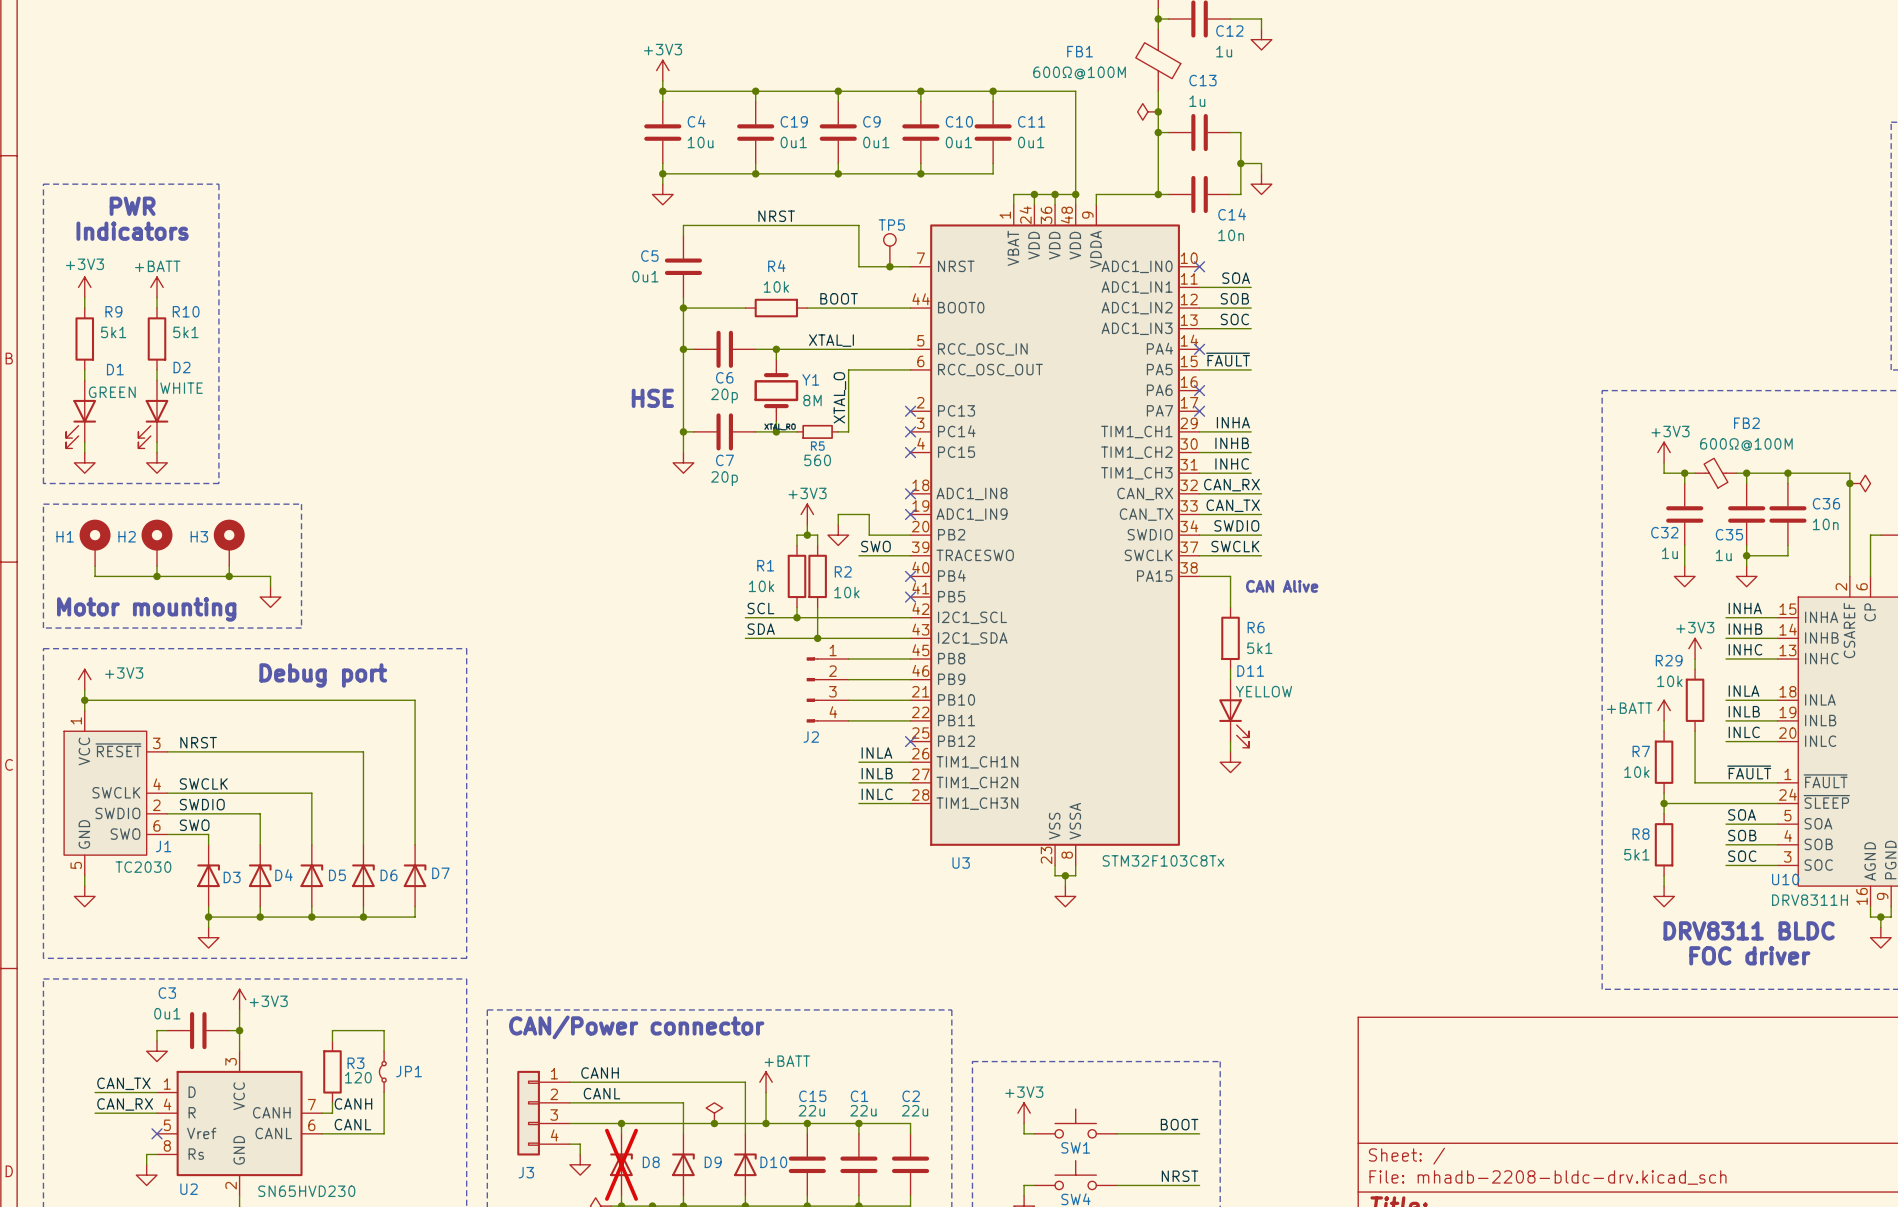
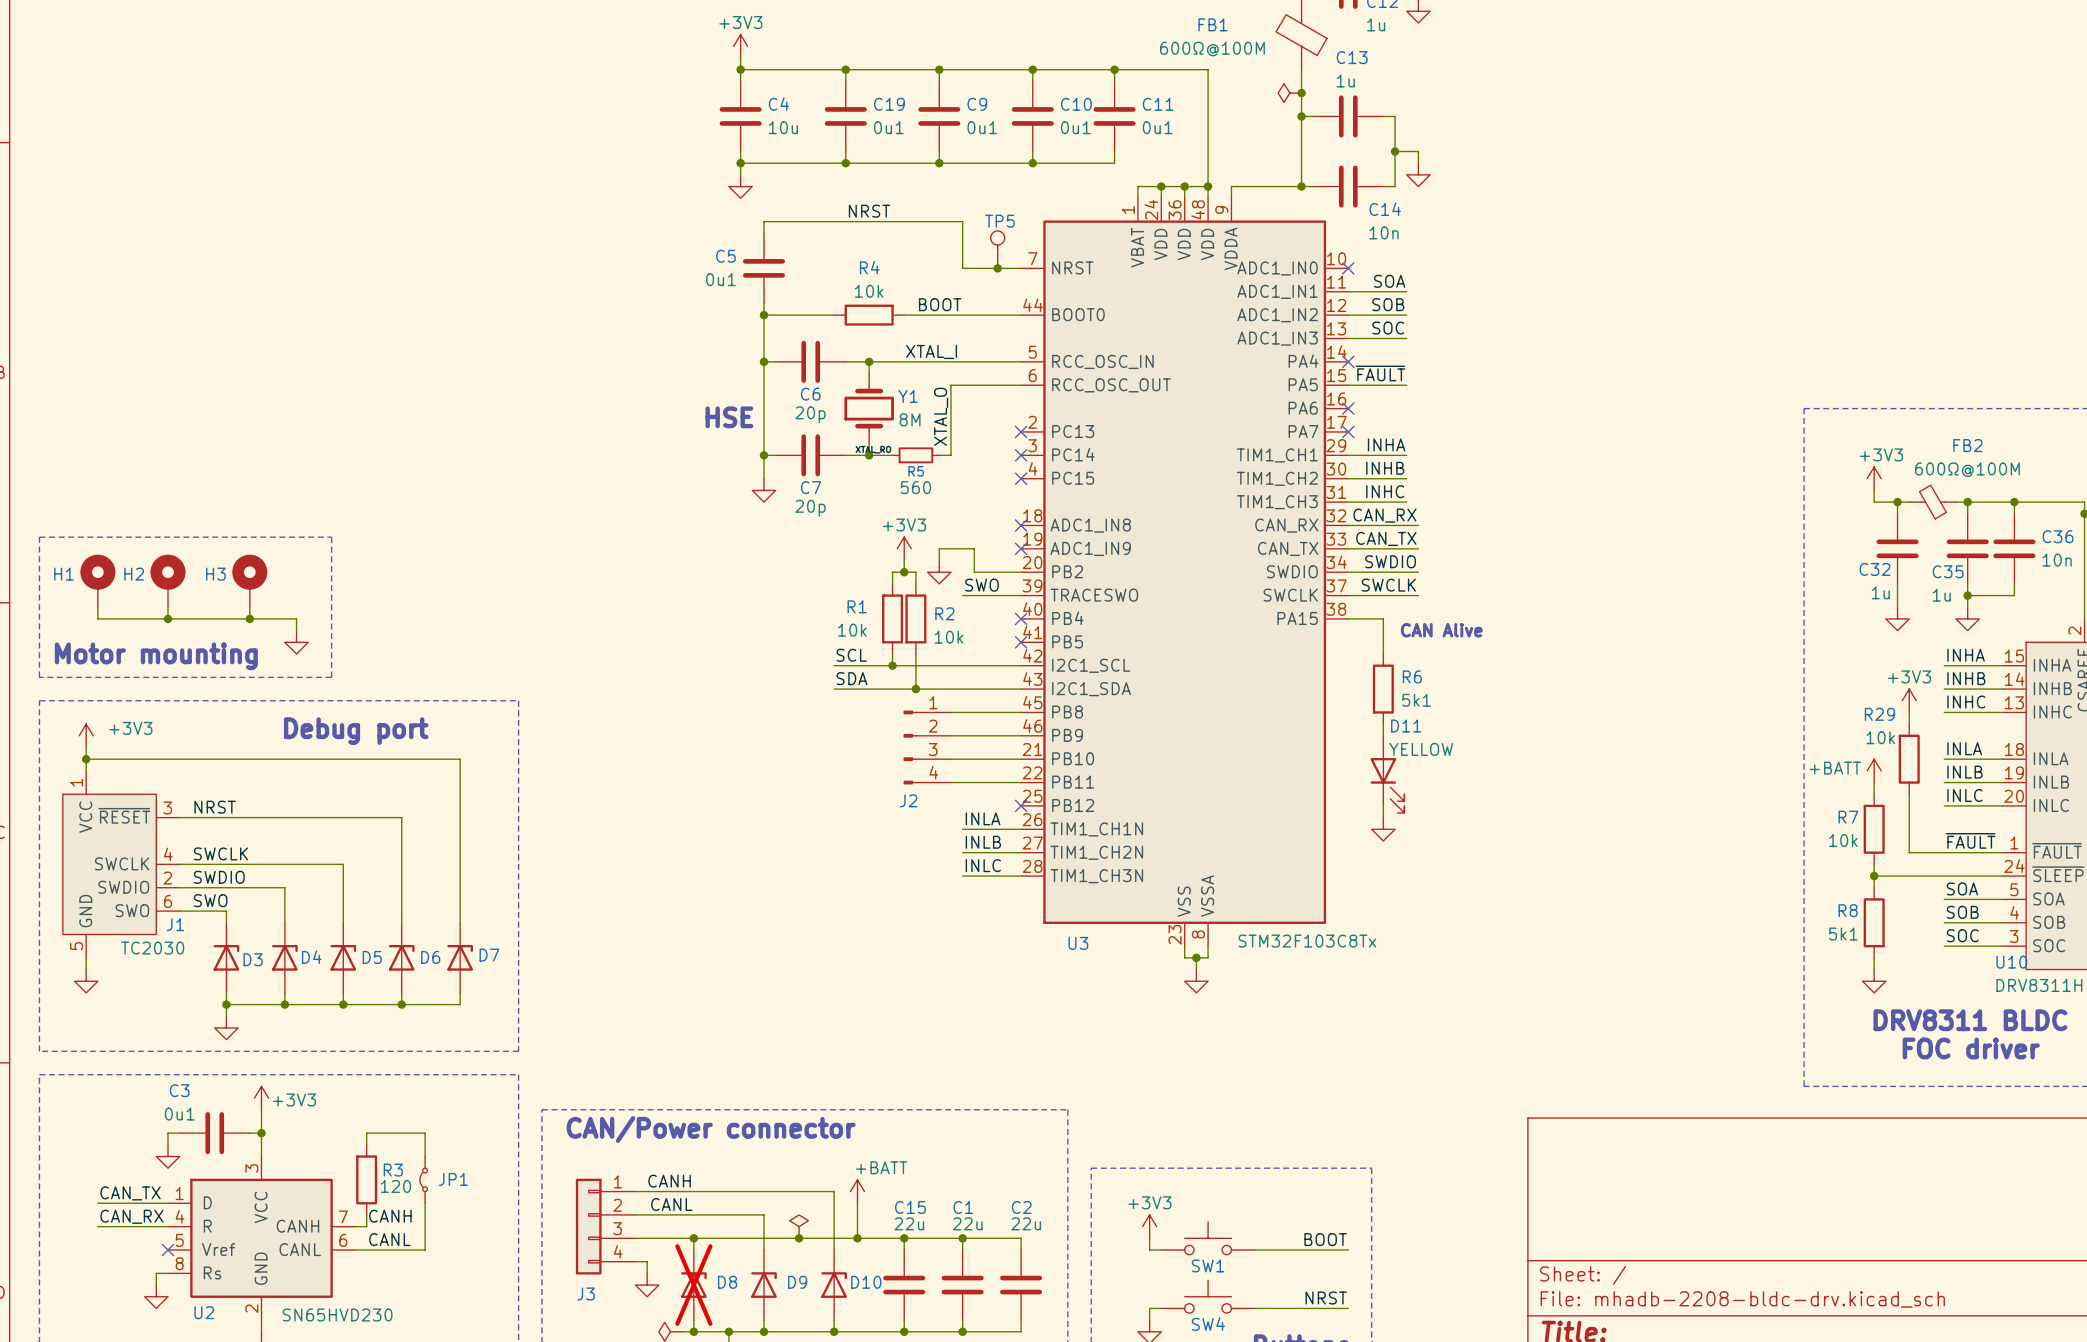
line: (43, 184) (218, 184) (218, 483) (43, 483) (43, 184) -> none
text: PWR (132, 206) -> none
text: Indicators (132, 231) -> none
power symbol: +3V3 (84, 287) -> none
power symbol: +BATT (157, 287) -> none
wire: (84, 297) (84, 308) -> none
wire: (157, 297) (157, 308) -> none
R9: 5k1 (84, 339) -> none
R10: 5k1 (157, 339) -> none
wire: (84, 369) (84, 380) -> none
wire: (157, 369) (157, 380) -> none
D1: GREEN (81, 414) -> none
D2: WHITE (153, 414) -> none
wire: (84, 442) (84, 452) -> none
wire: (157, 442) (157, 452) -> none
power symbol: (84, 462) -> none
power symbol: (157, 462) -> none

